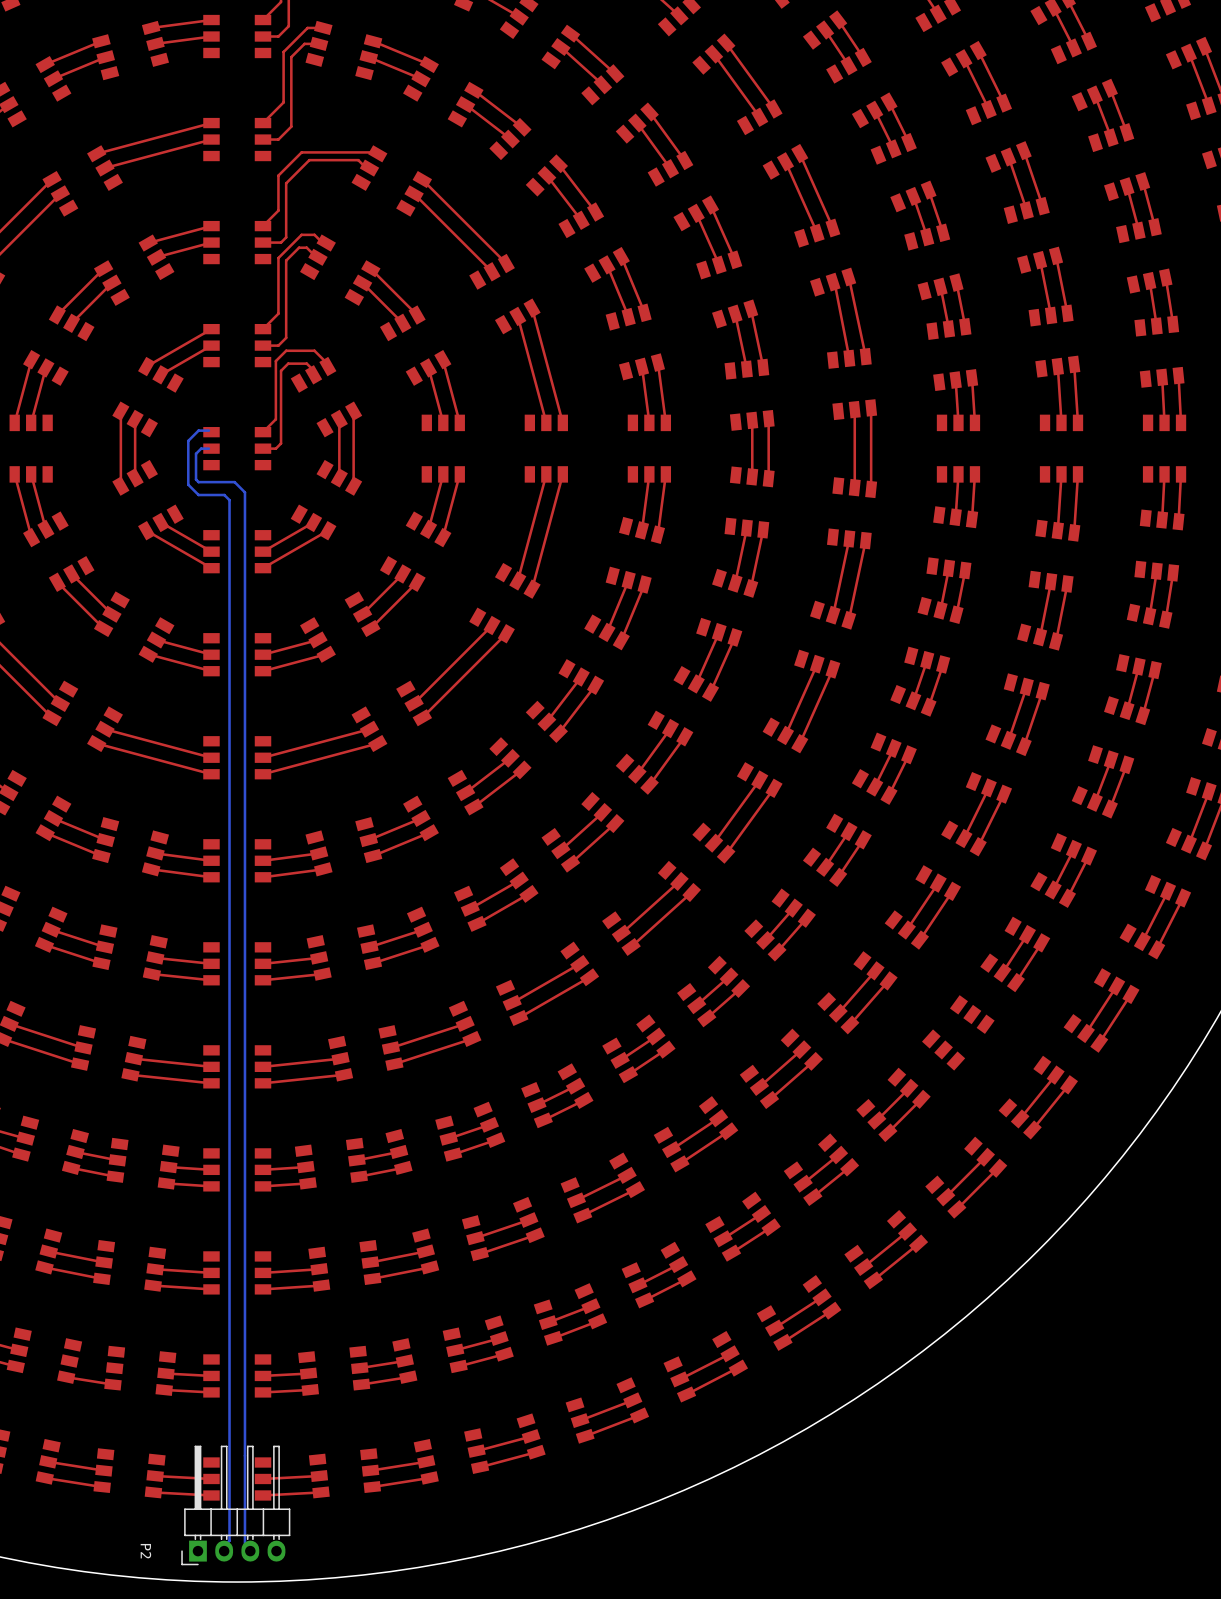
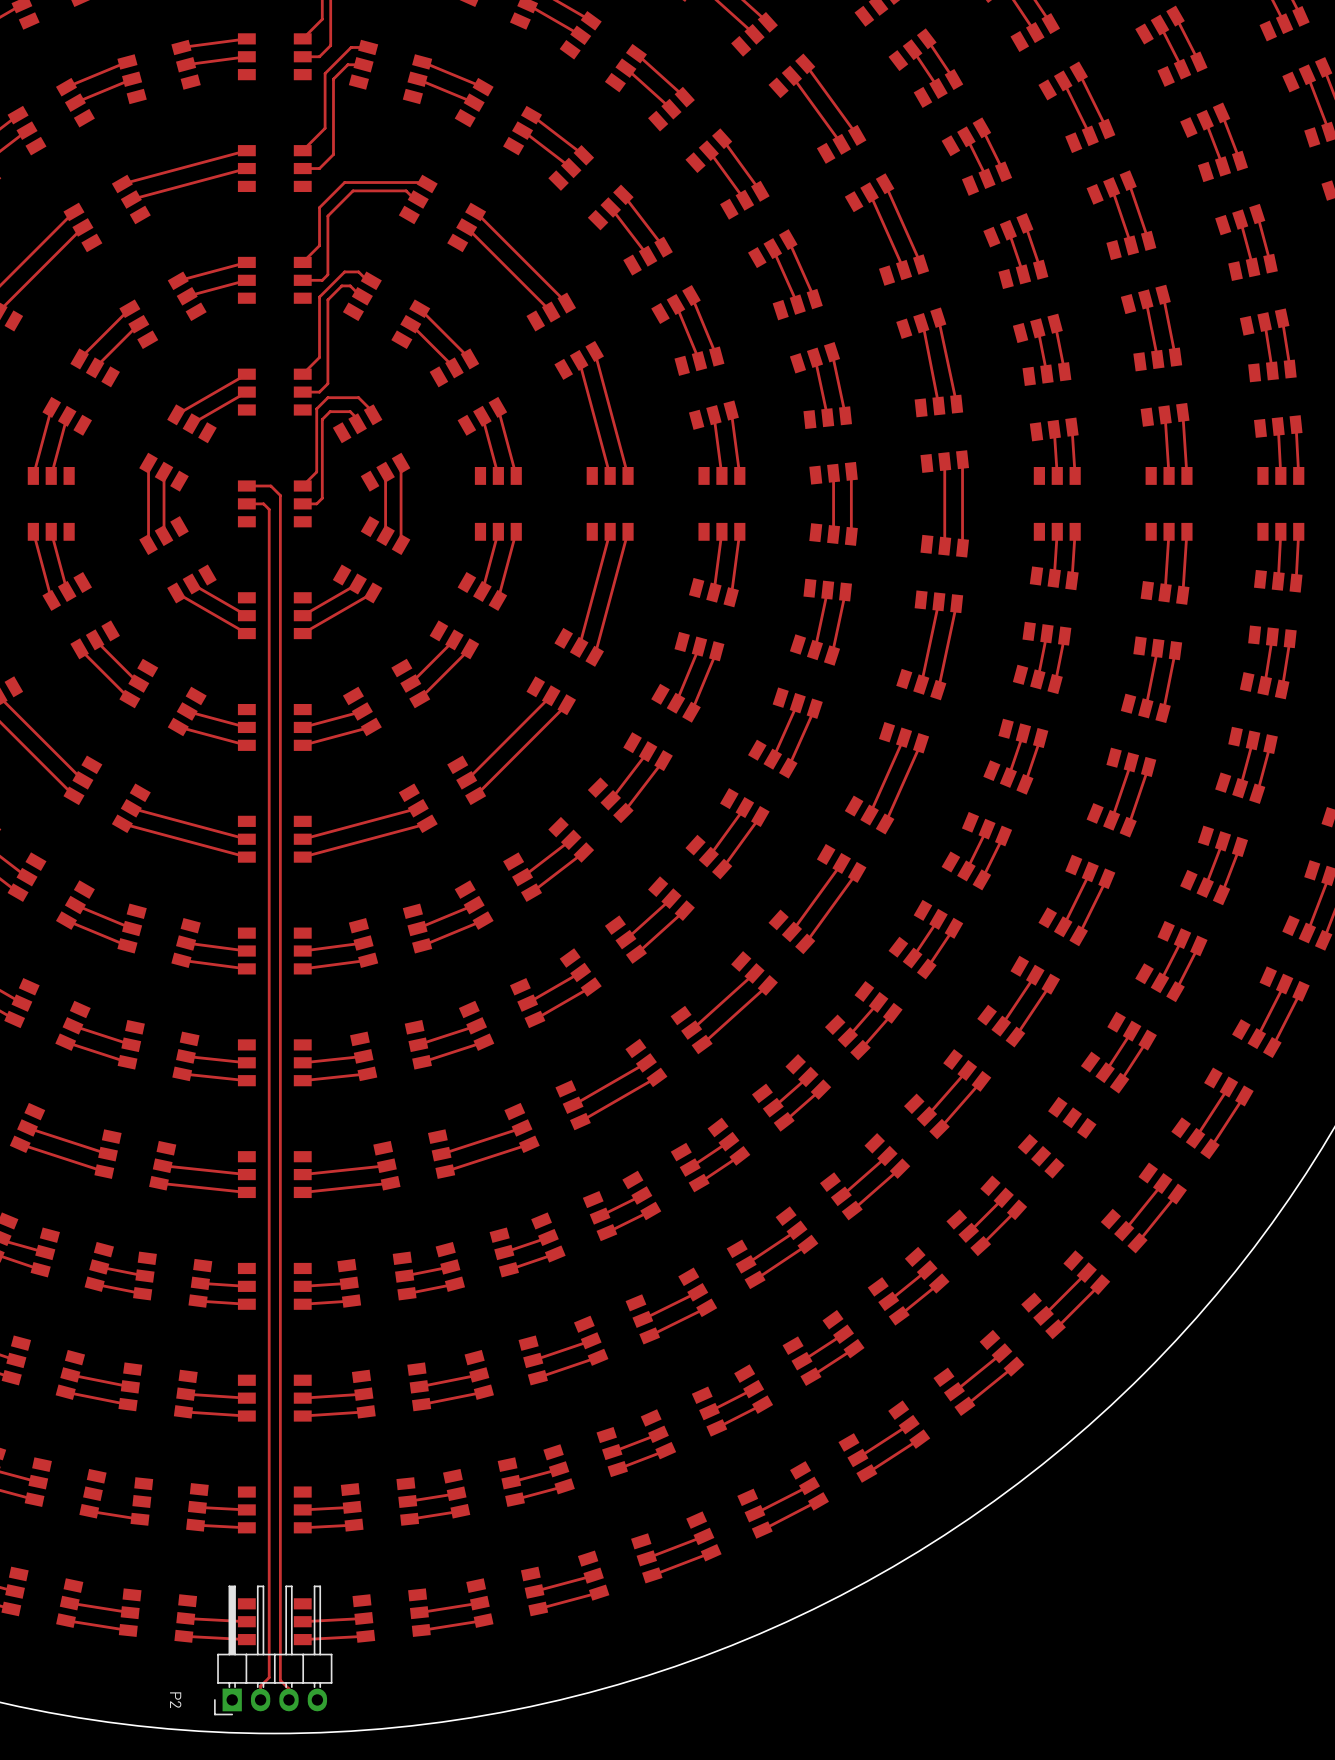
bottom track: (208, 430) (198, 430) (188, 440) (188, 484) (198, 495) (224, 495) (229, 500) (229, 1540) (224, 1546) -> none
top track: none -> (246, 486) (270, 486) (280, 495) (280, 1680) (289, 1689) (289, 1699)
bottom track: (208, 448) (201, 448) (196, 453) (196, 479) (198, 482) (234, 482) (244, 492) (244, 1545) -> none
top track: none -> (246, 503) (263, 503) (269, 509) (269, 1677) (260, 1686) (260, 1699)

